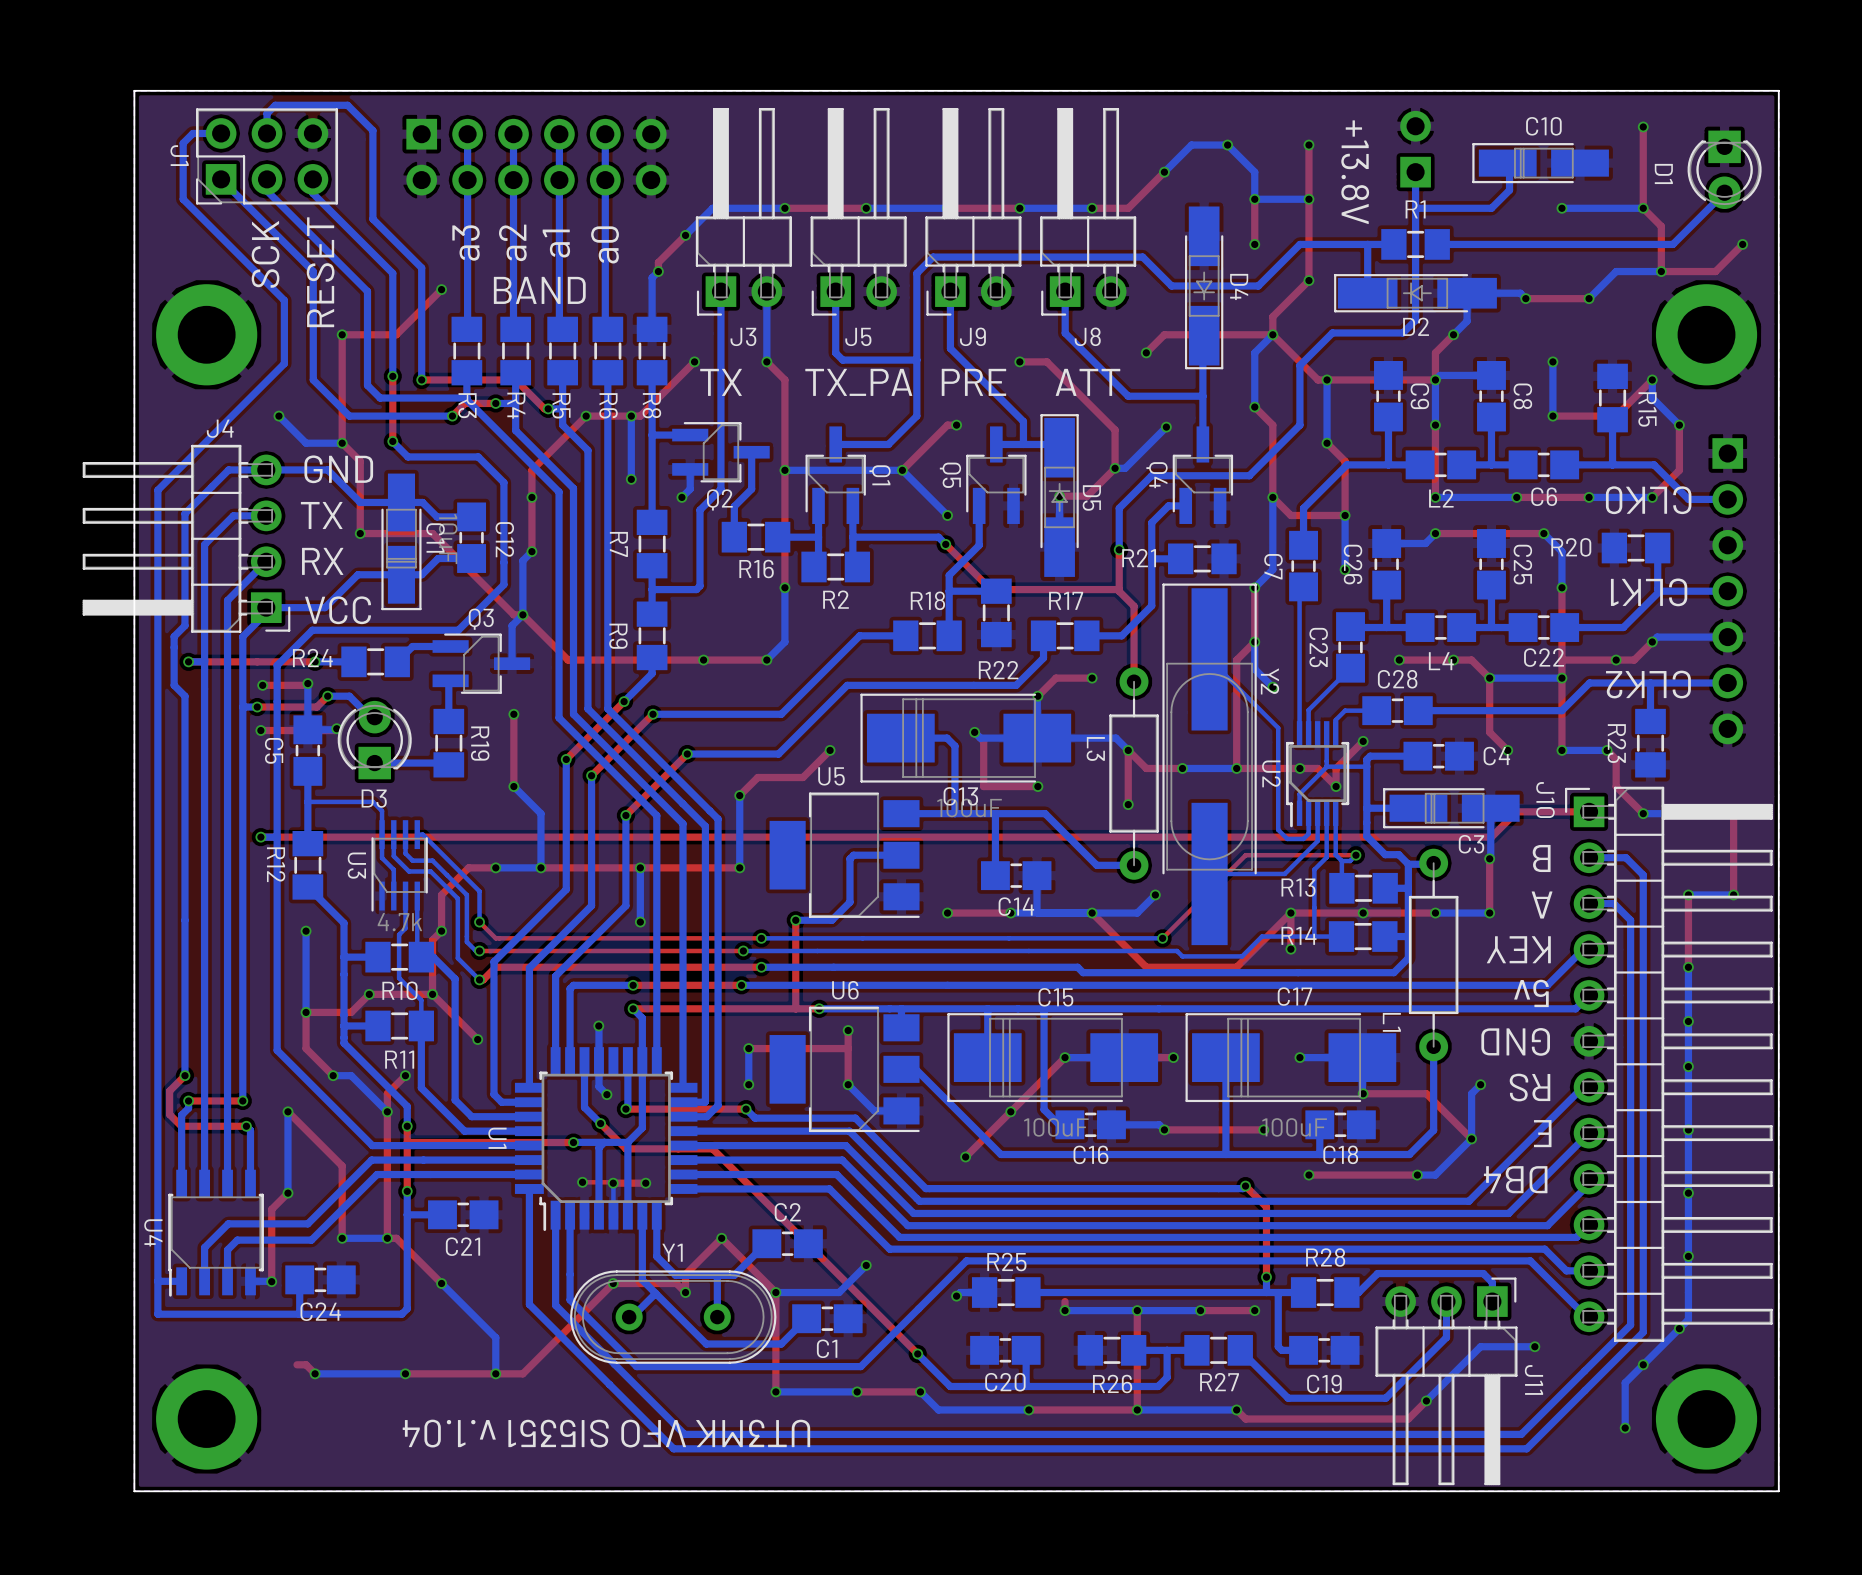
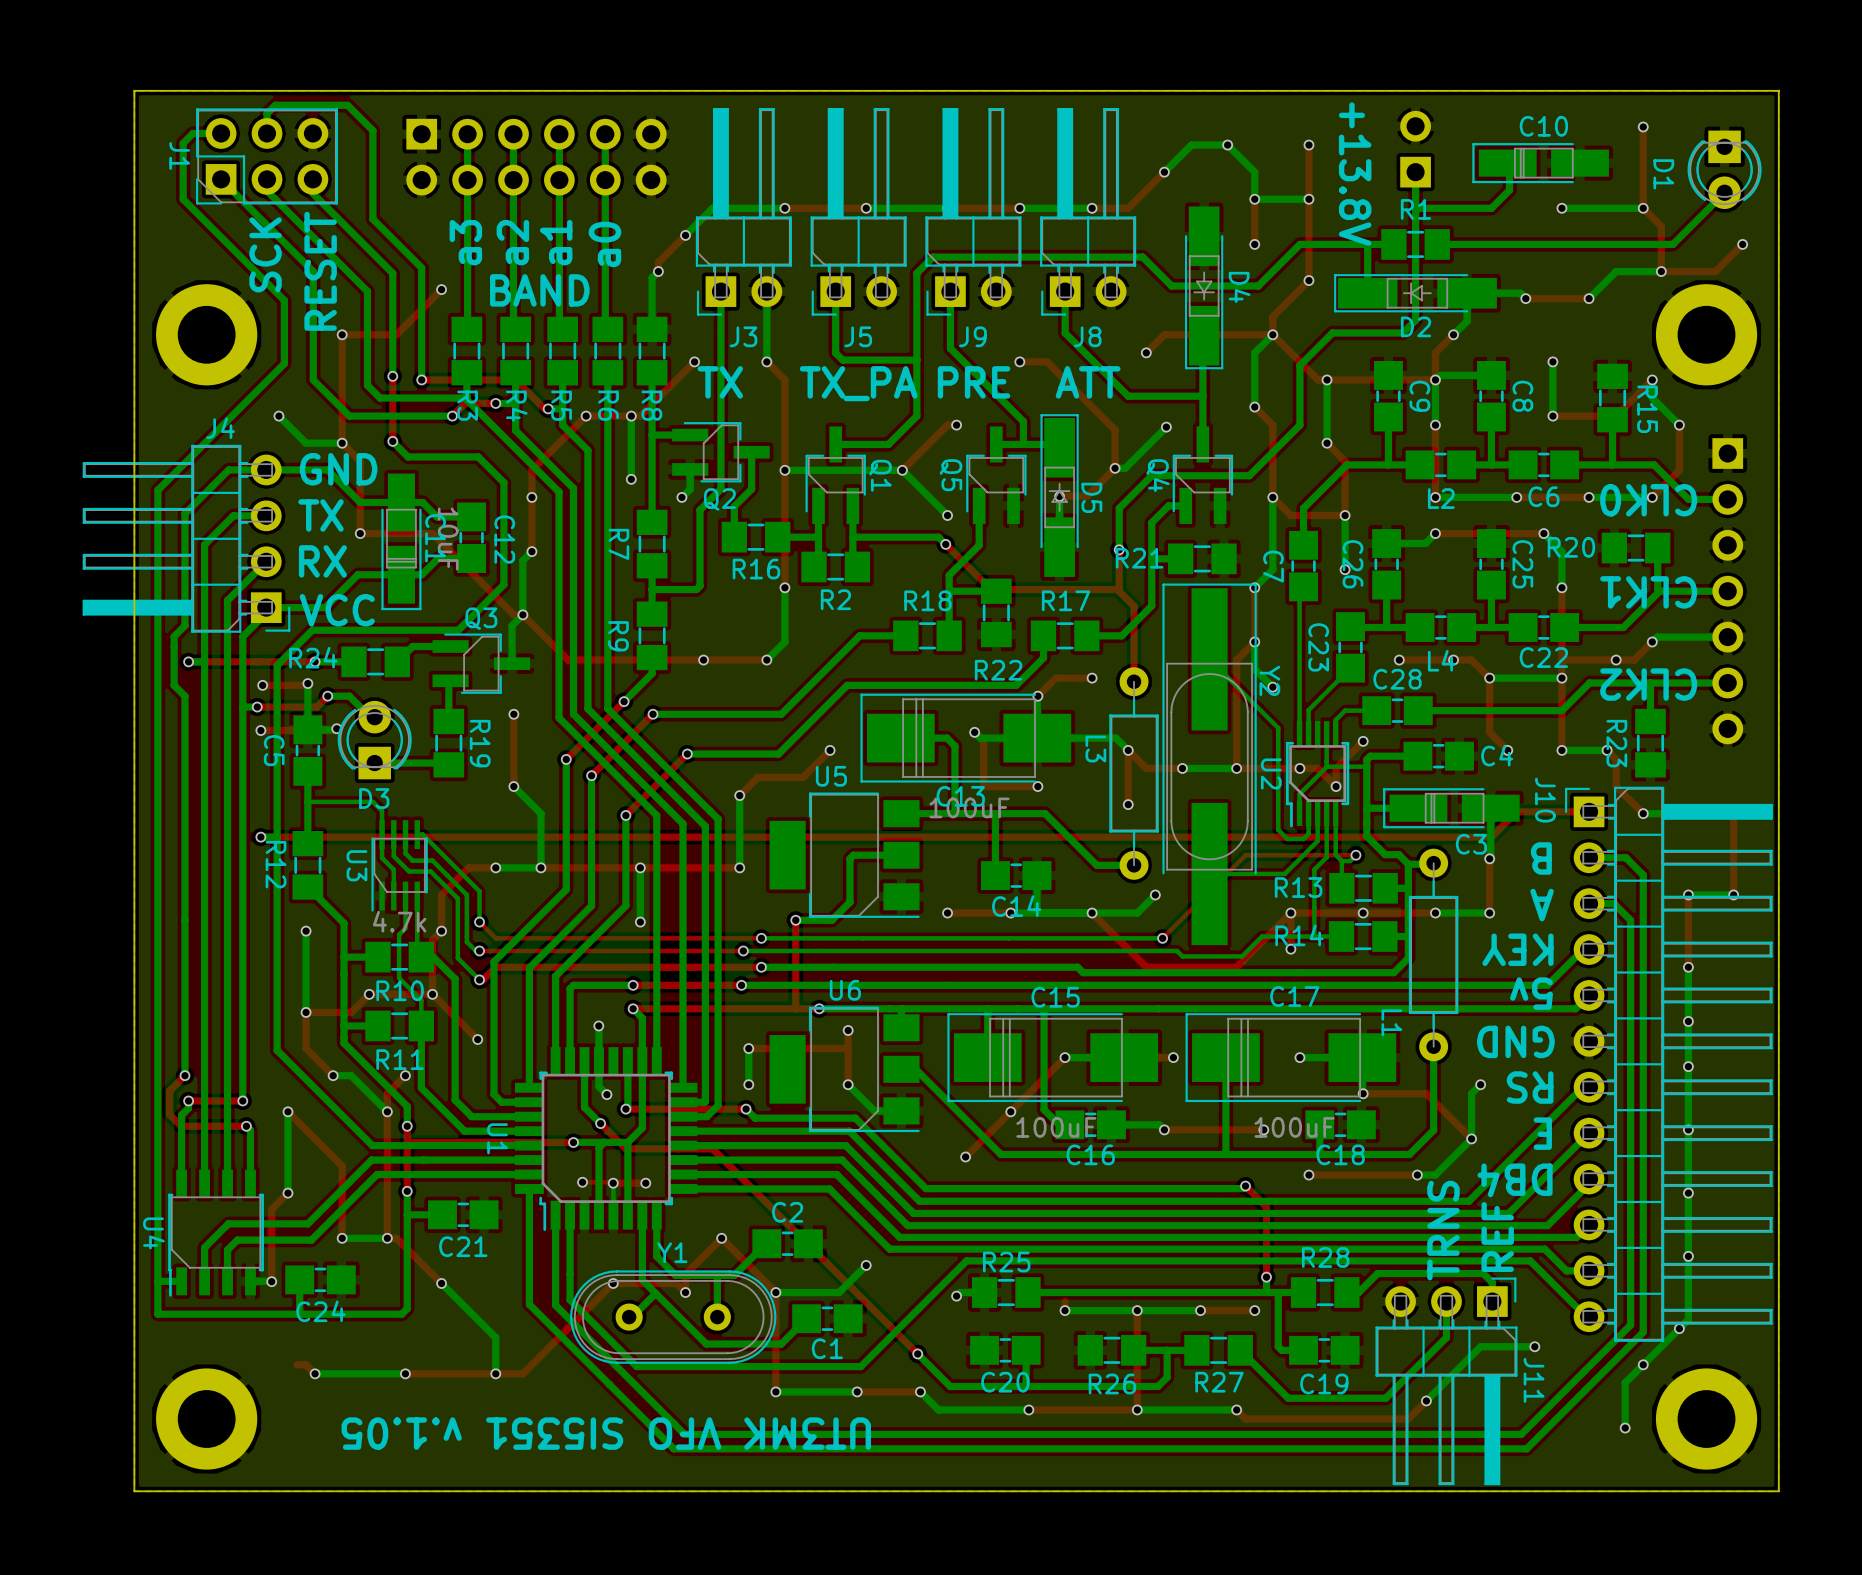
text: none -> TRNS (1443, 1230)
text: none -> REF (1497, 1237)
text: UT3MK VFO SI5351 v.1.04 (606, 1433) -> UT3MK VFO SI5351 v.1.05 (606, 1433)

